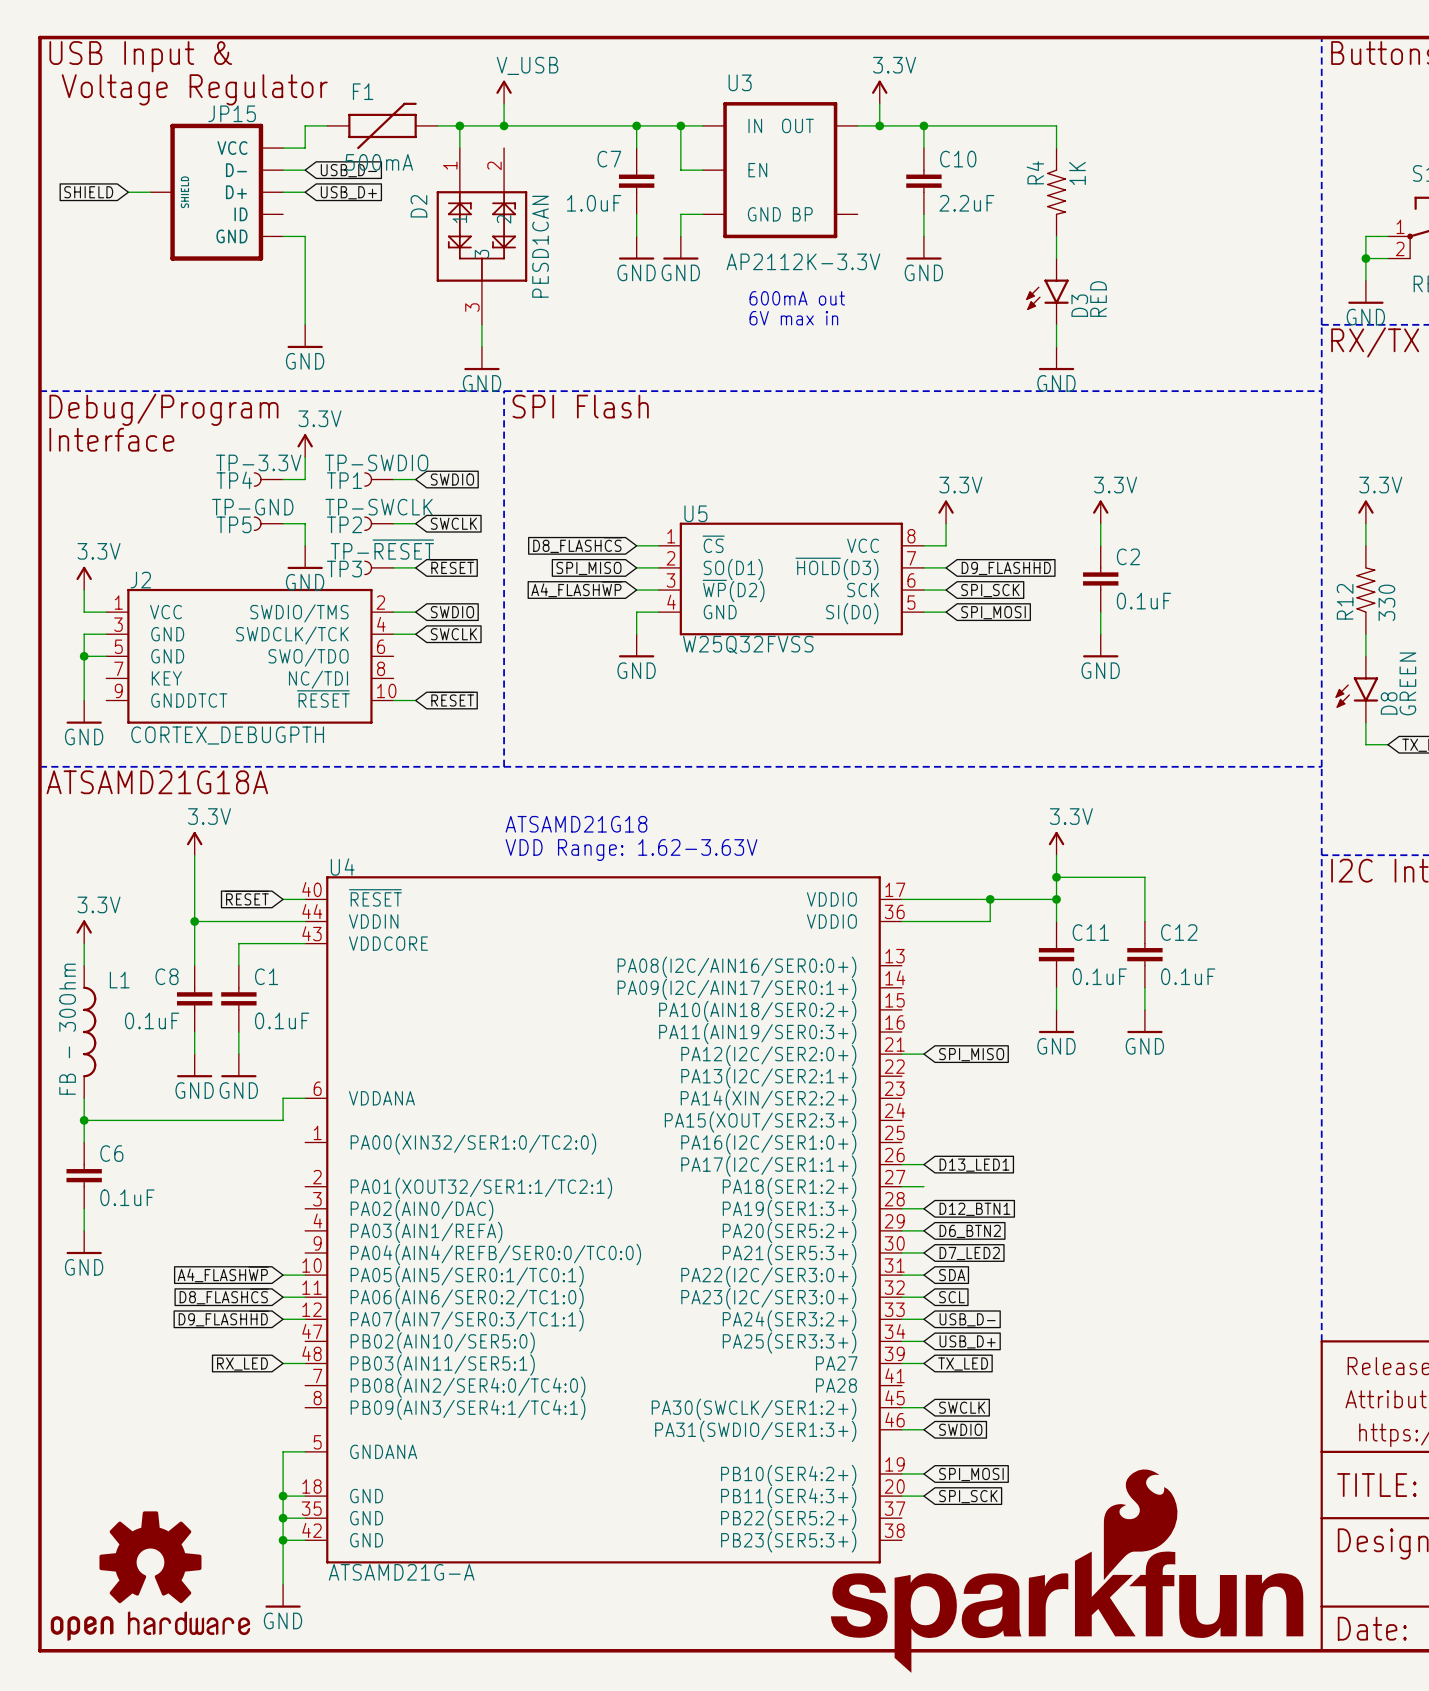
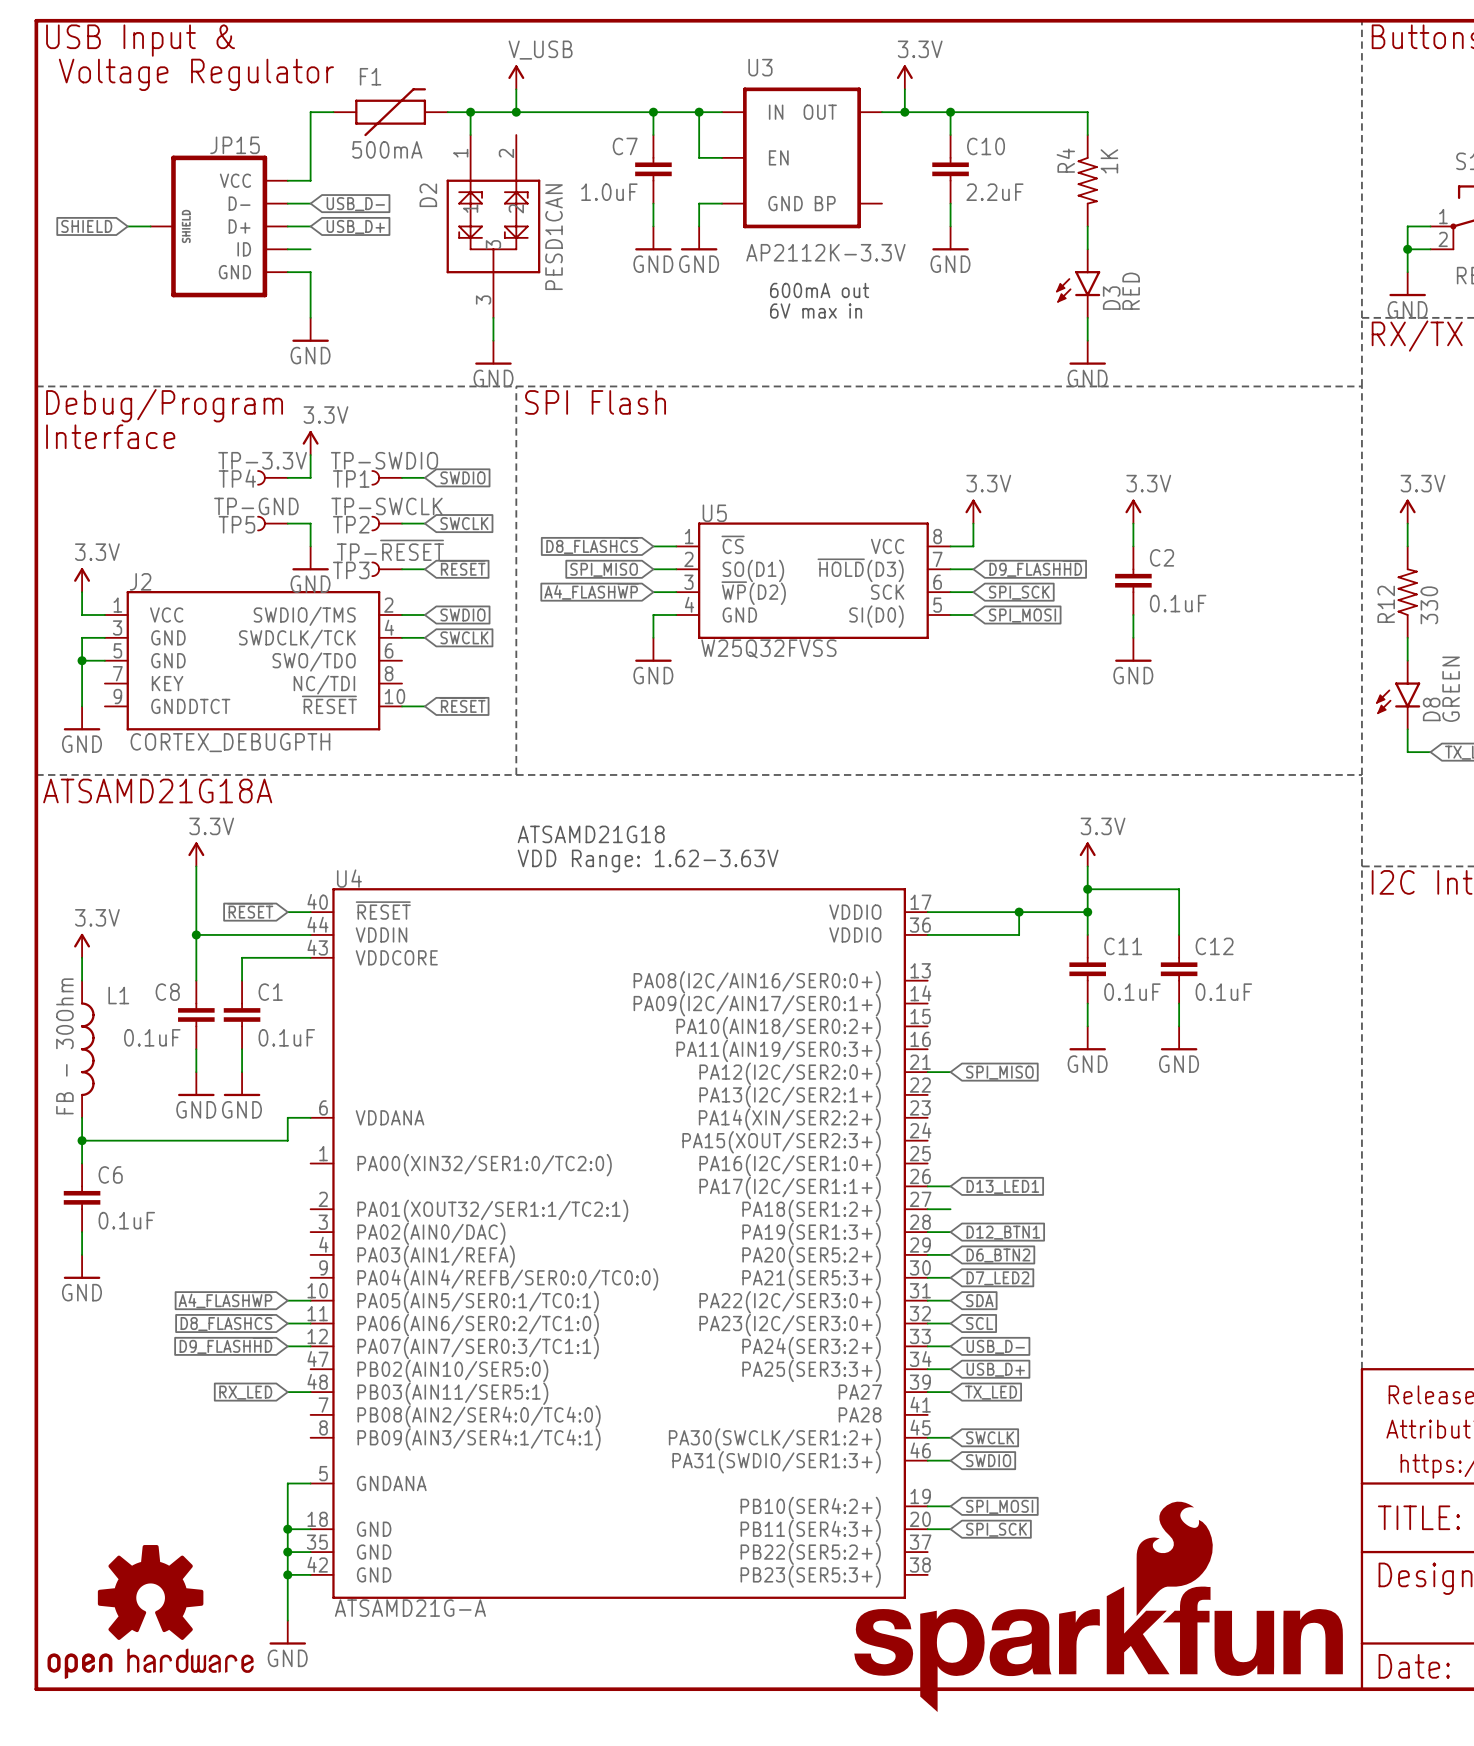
wire: (283, 148) (305, 148) -> (310, 180) (310, 135)
wire: (283, 170) (305, 170) -> (287, 203) (310, 203)
global label position: USB_D- (348, 170) -> USB_D- (355, 204)
global label position: SHIELD (88, 192) -> SHIELD (86, 226)
wire: (128, 192) (150, 192) -> (127, 226) (150, 226)
JP15 position: (216, 192) -> (219, 226)
global label position: USB_D+ (348, 192) -> USB_D+ (355, 227)
wire: (305, 236) (305, 280) -> (287, 272) (310, 272)
wire: none -> (287, 249) (310, 249)

